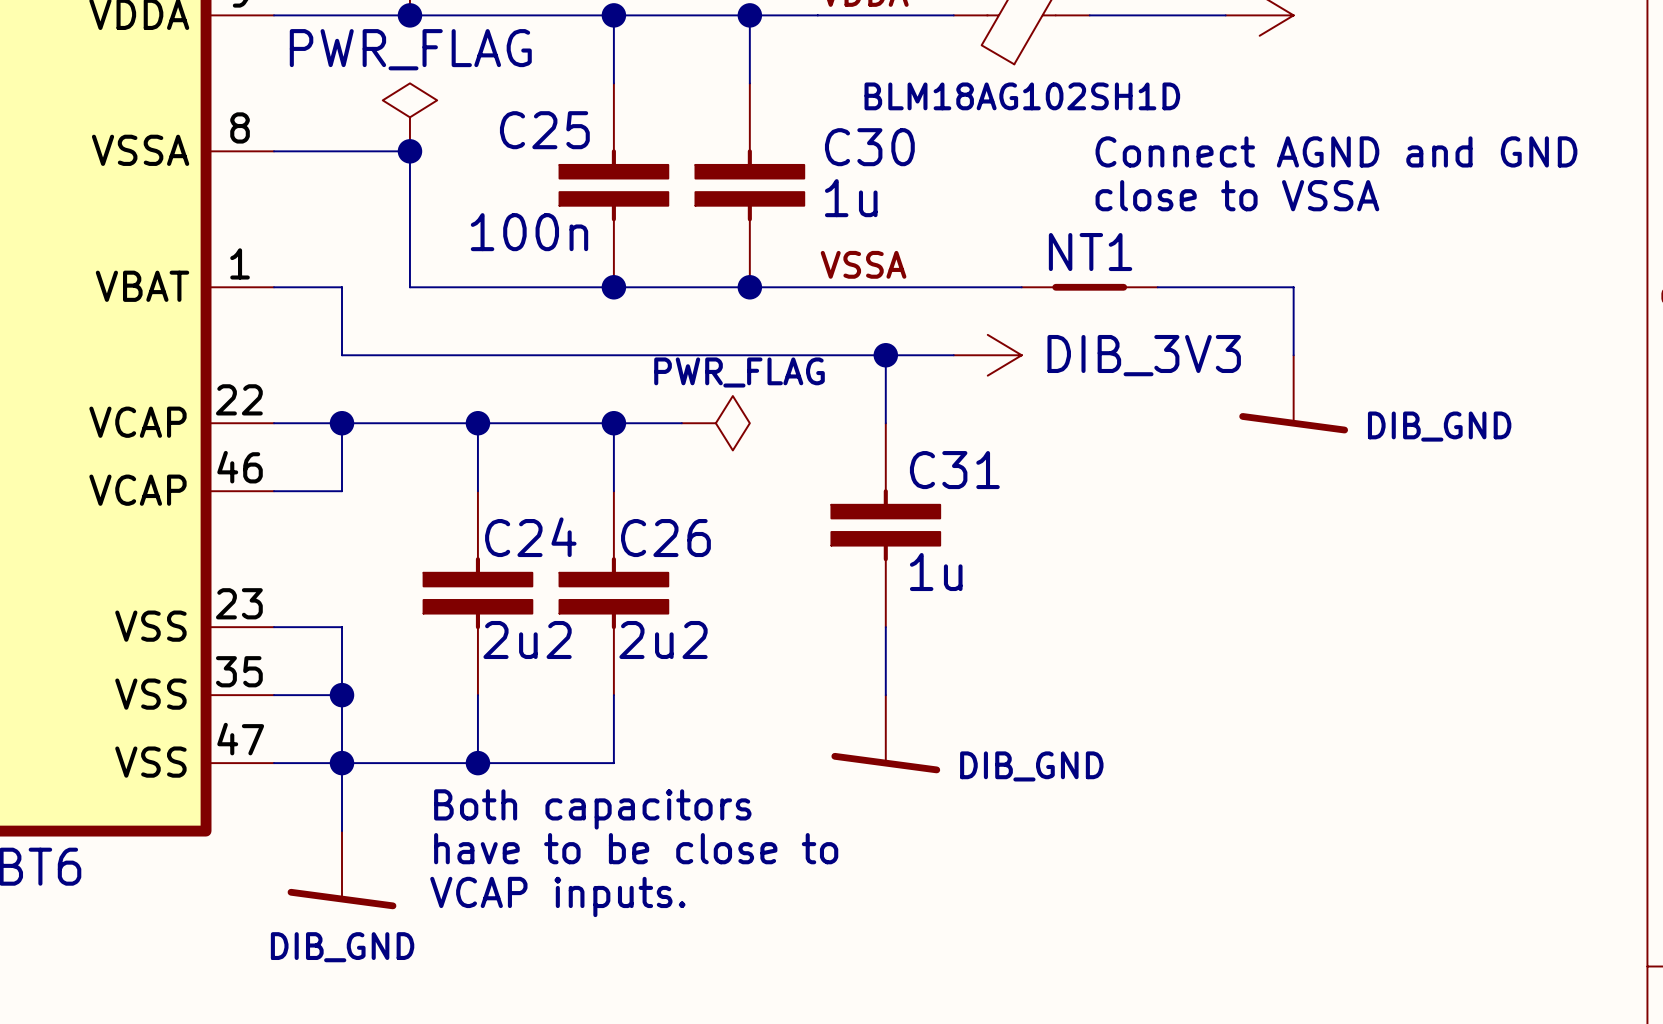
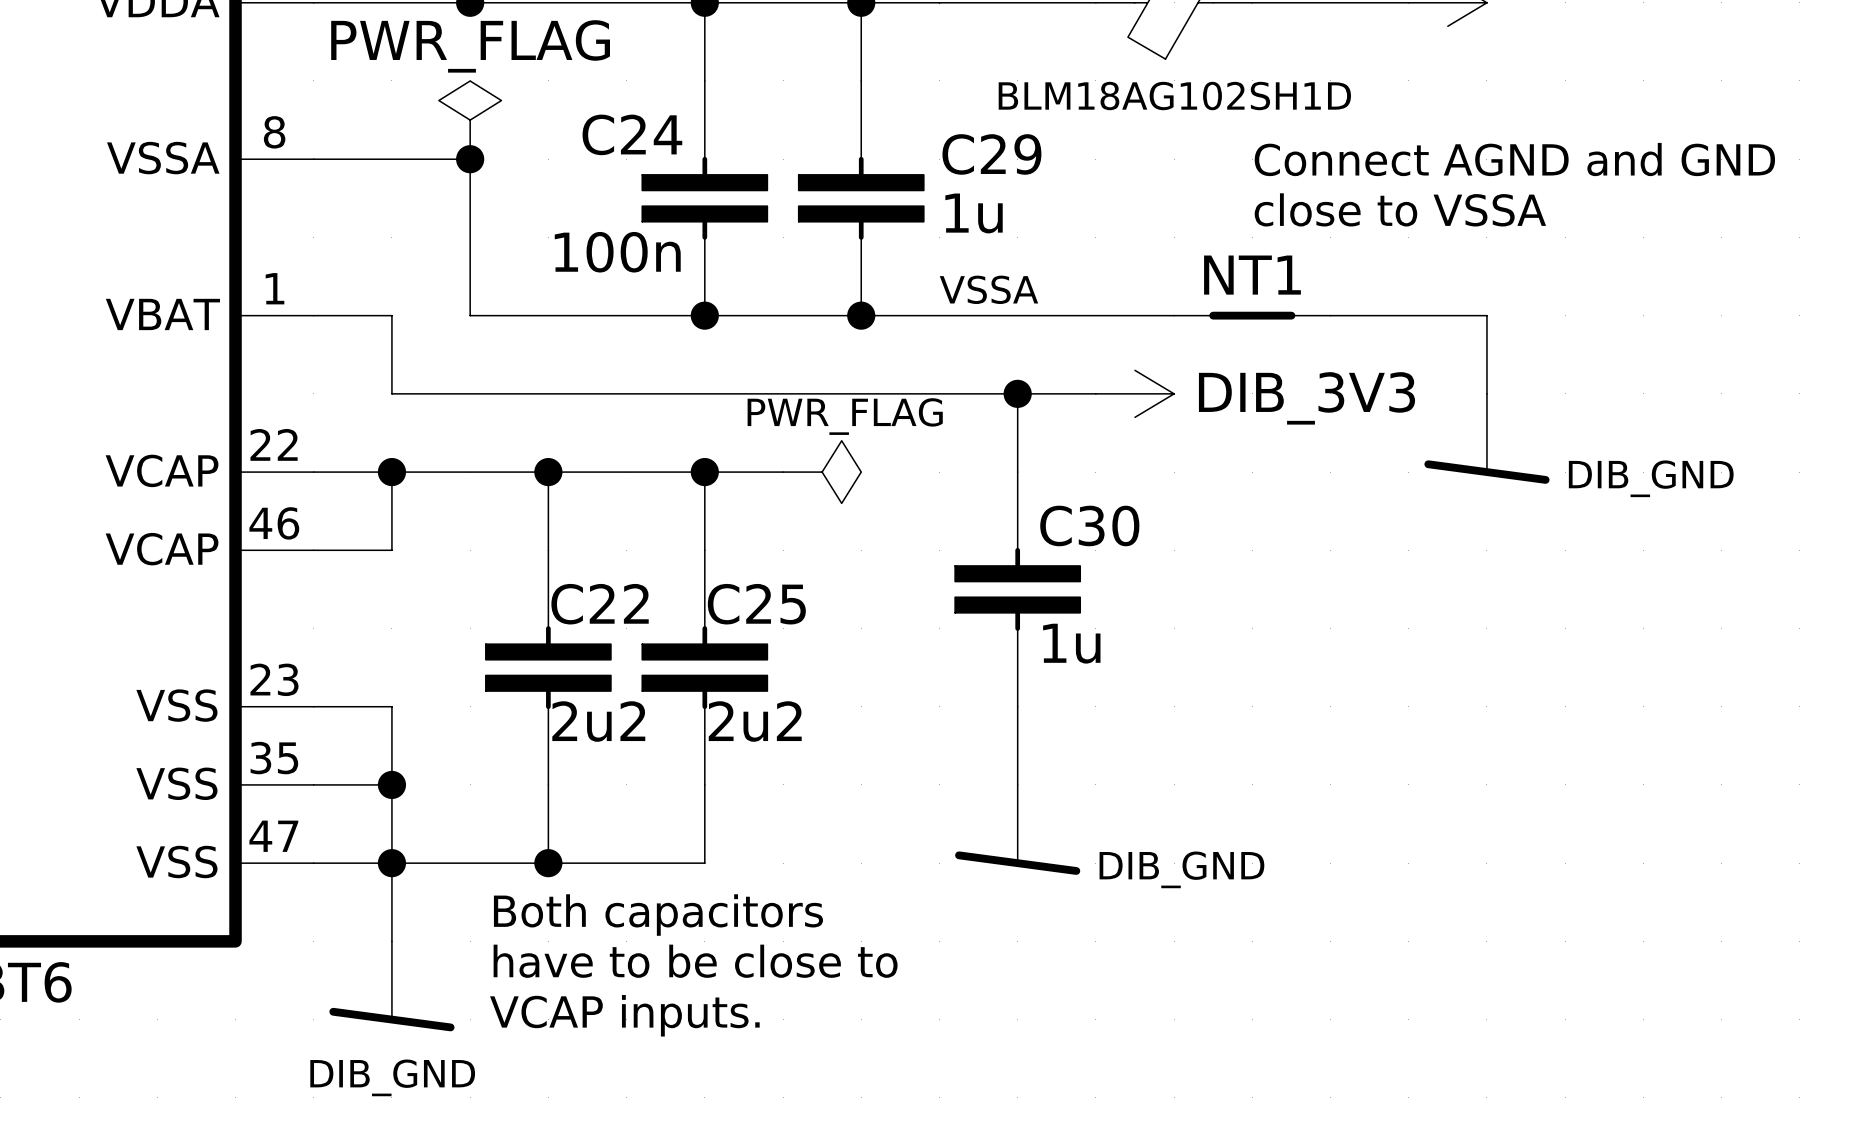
C25 name: C25 (544, 130) -> C24 (632, 134)
C30 name: C30 (869, 147) -> C29 (991, 154)
C31 name: C31 (954, 470) -> C30 (1089, 525)
C24 name: C24 (530, 537) -> C22 (600, 604)
C26 name: C26 (665, 538) -> C25 (756, 604)

